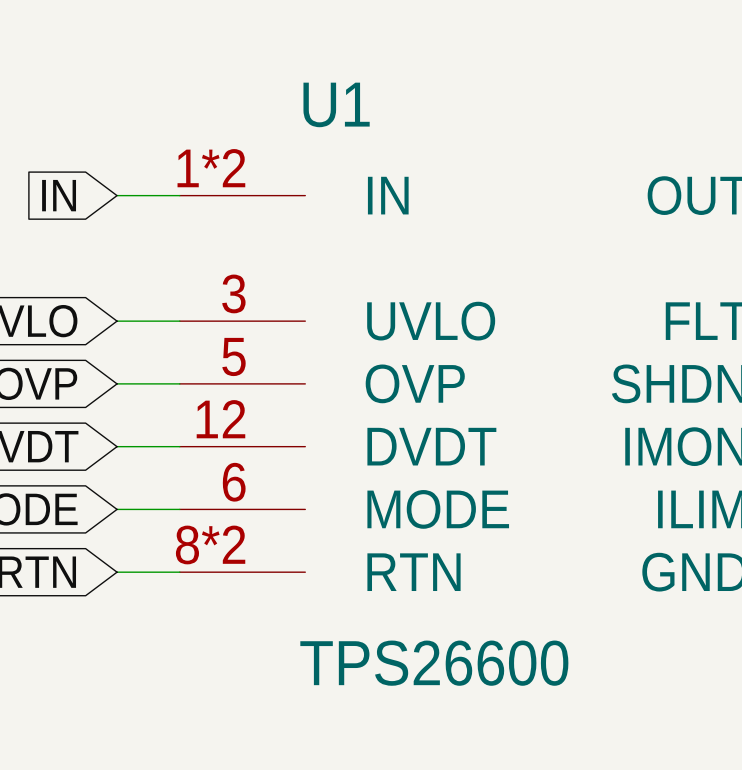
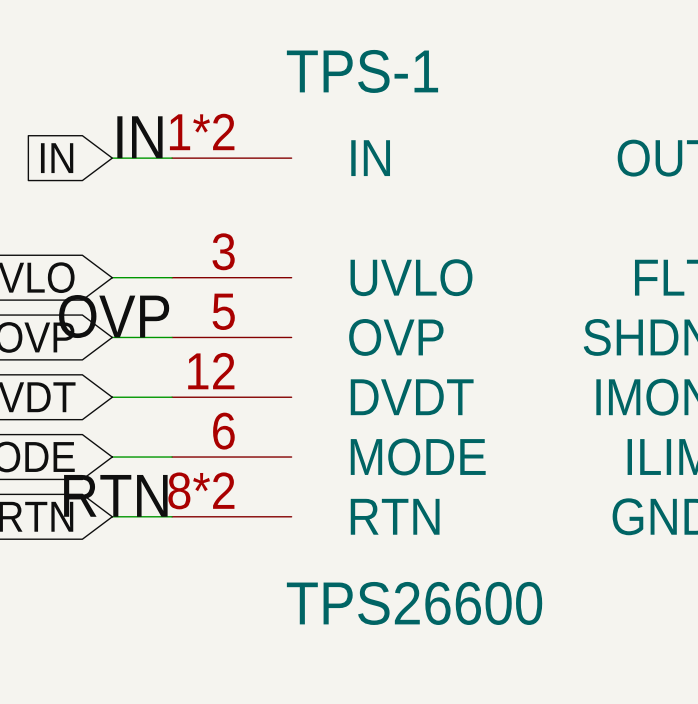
U1 name: U1 (336, 104) -> TPS-1 (362, 71)
label: none -> IN (139, 137)
label: none -> OVP (114, 316)
label: none -> RTN (115, 495)

